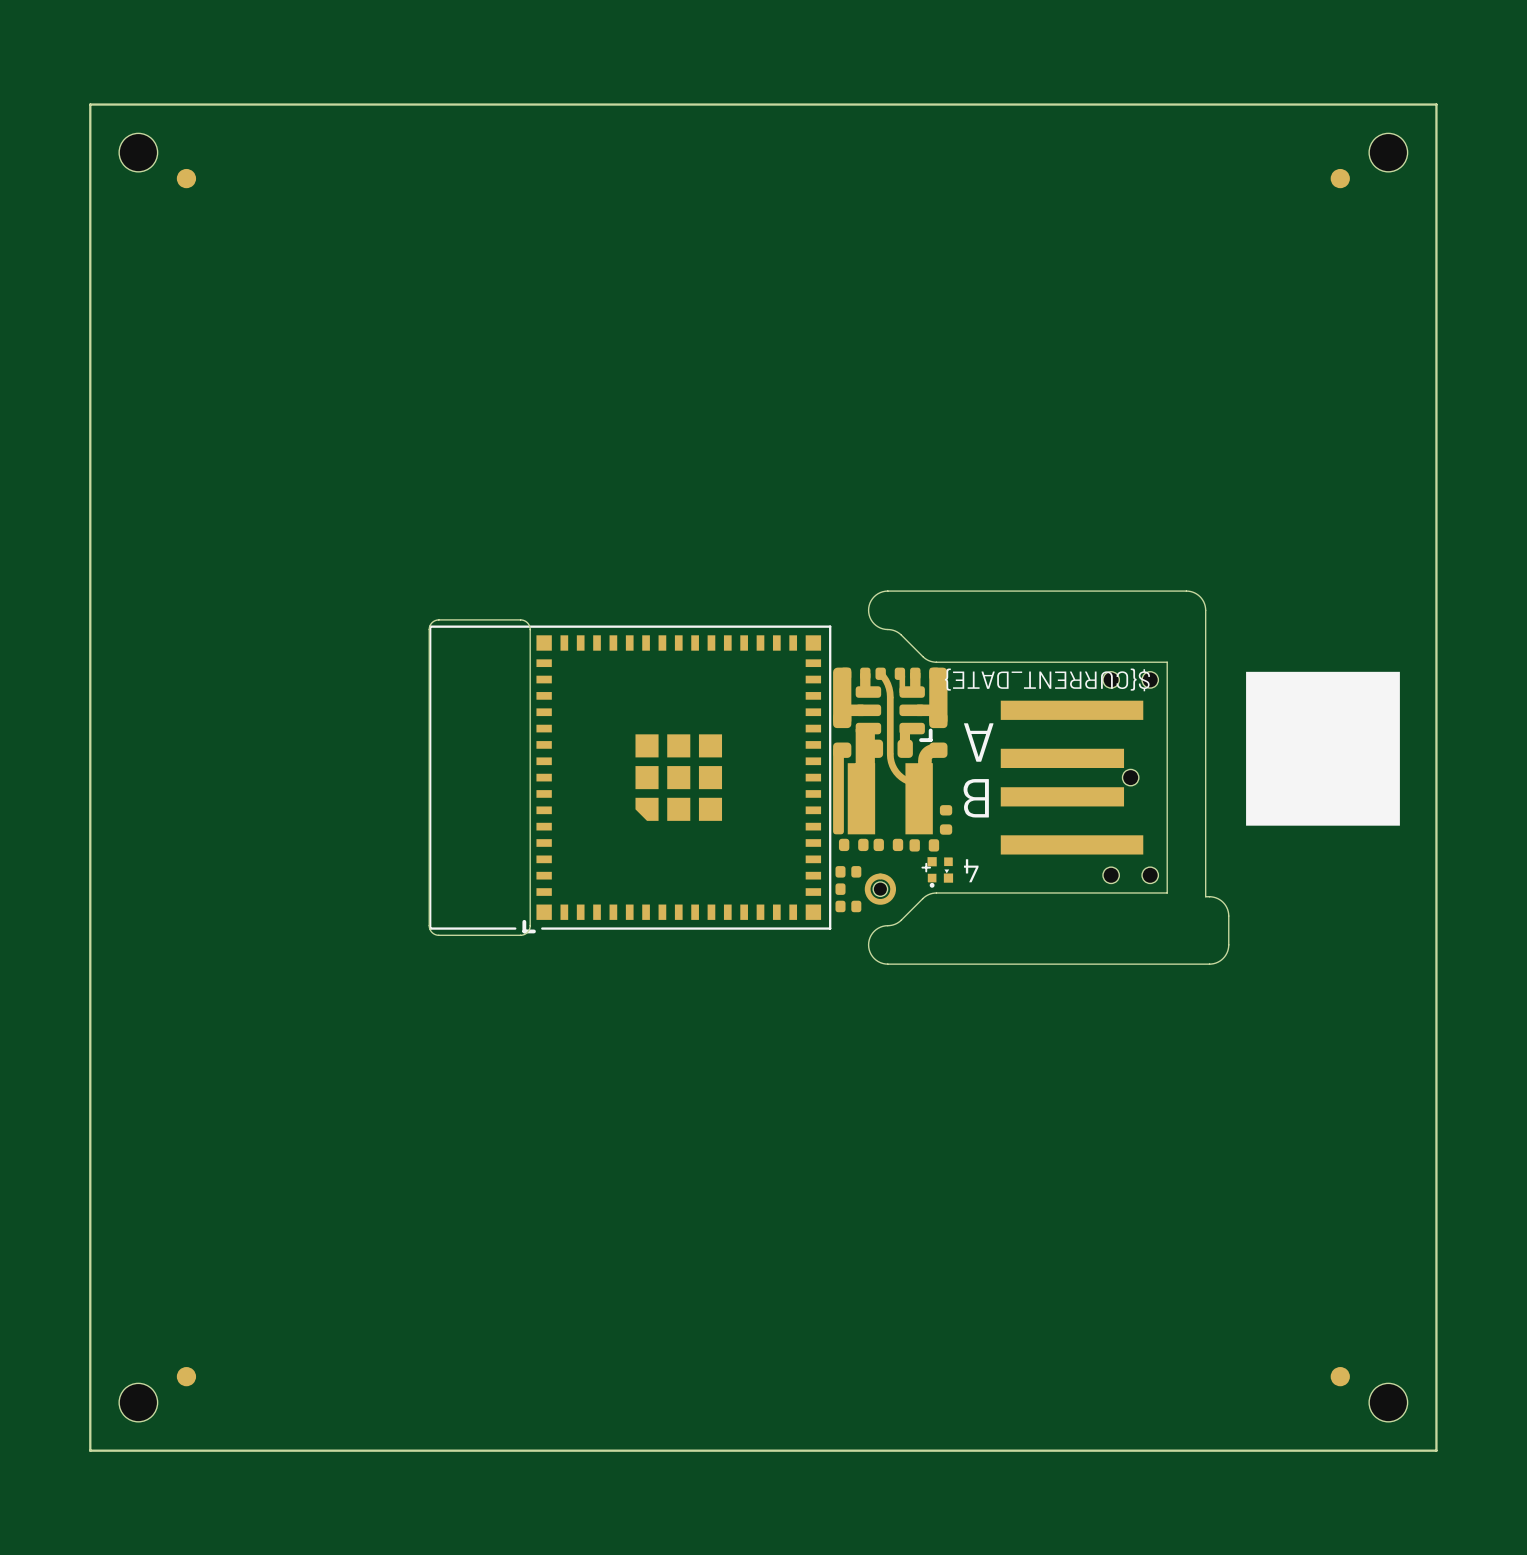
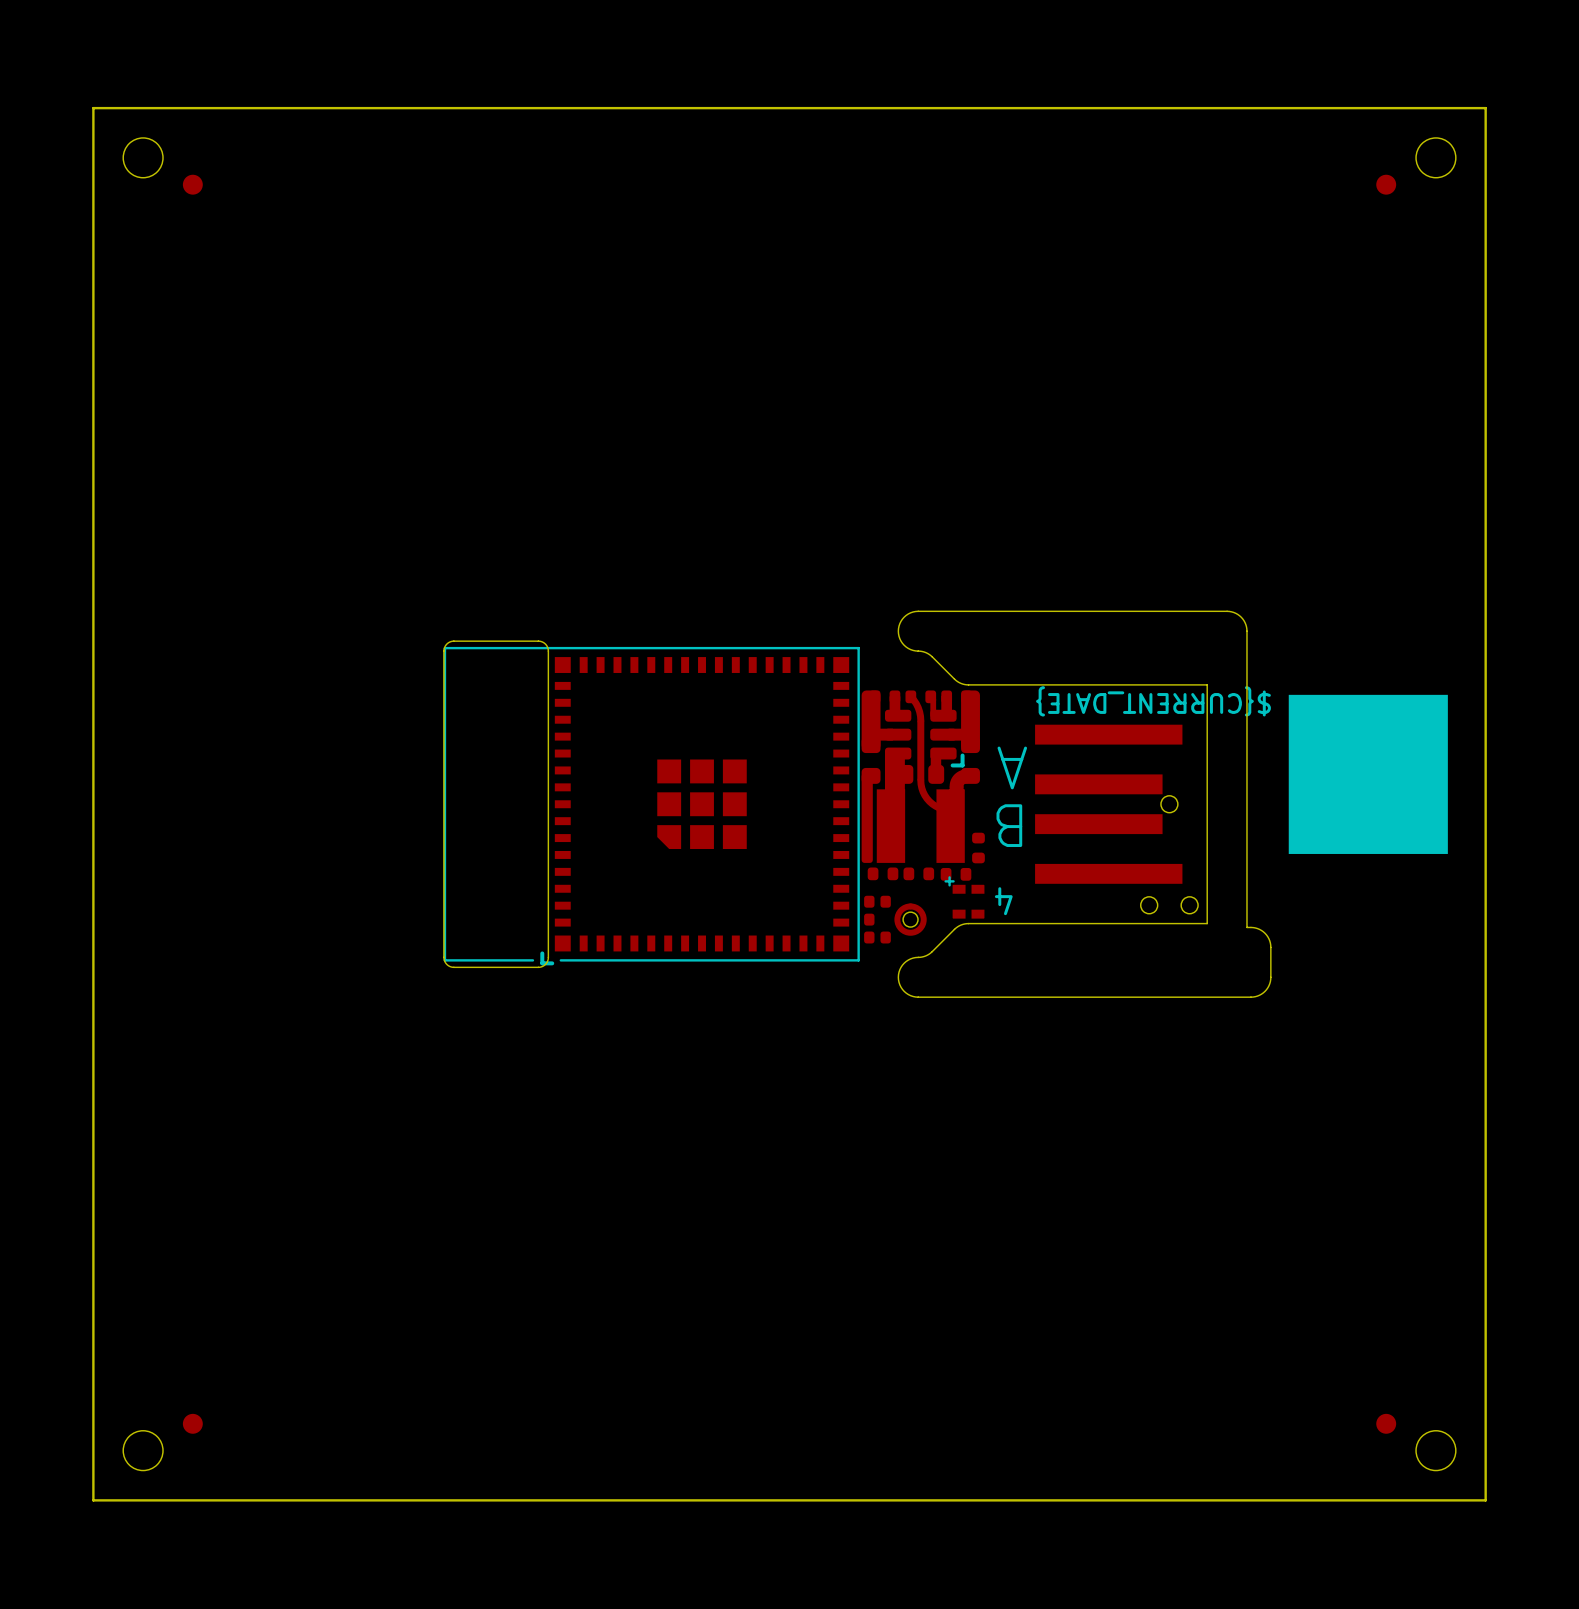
text position: ${CURRENT_DATE} (1047, 679) -> ${CURRENT_DATE} (1153, 701)
part: (1130, 679) -> none
part footprint: [921, 857, 954, 888] -> [944, 876, 985, 919]

